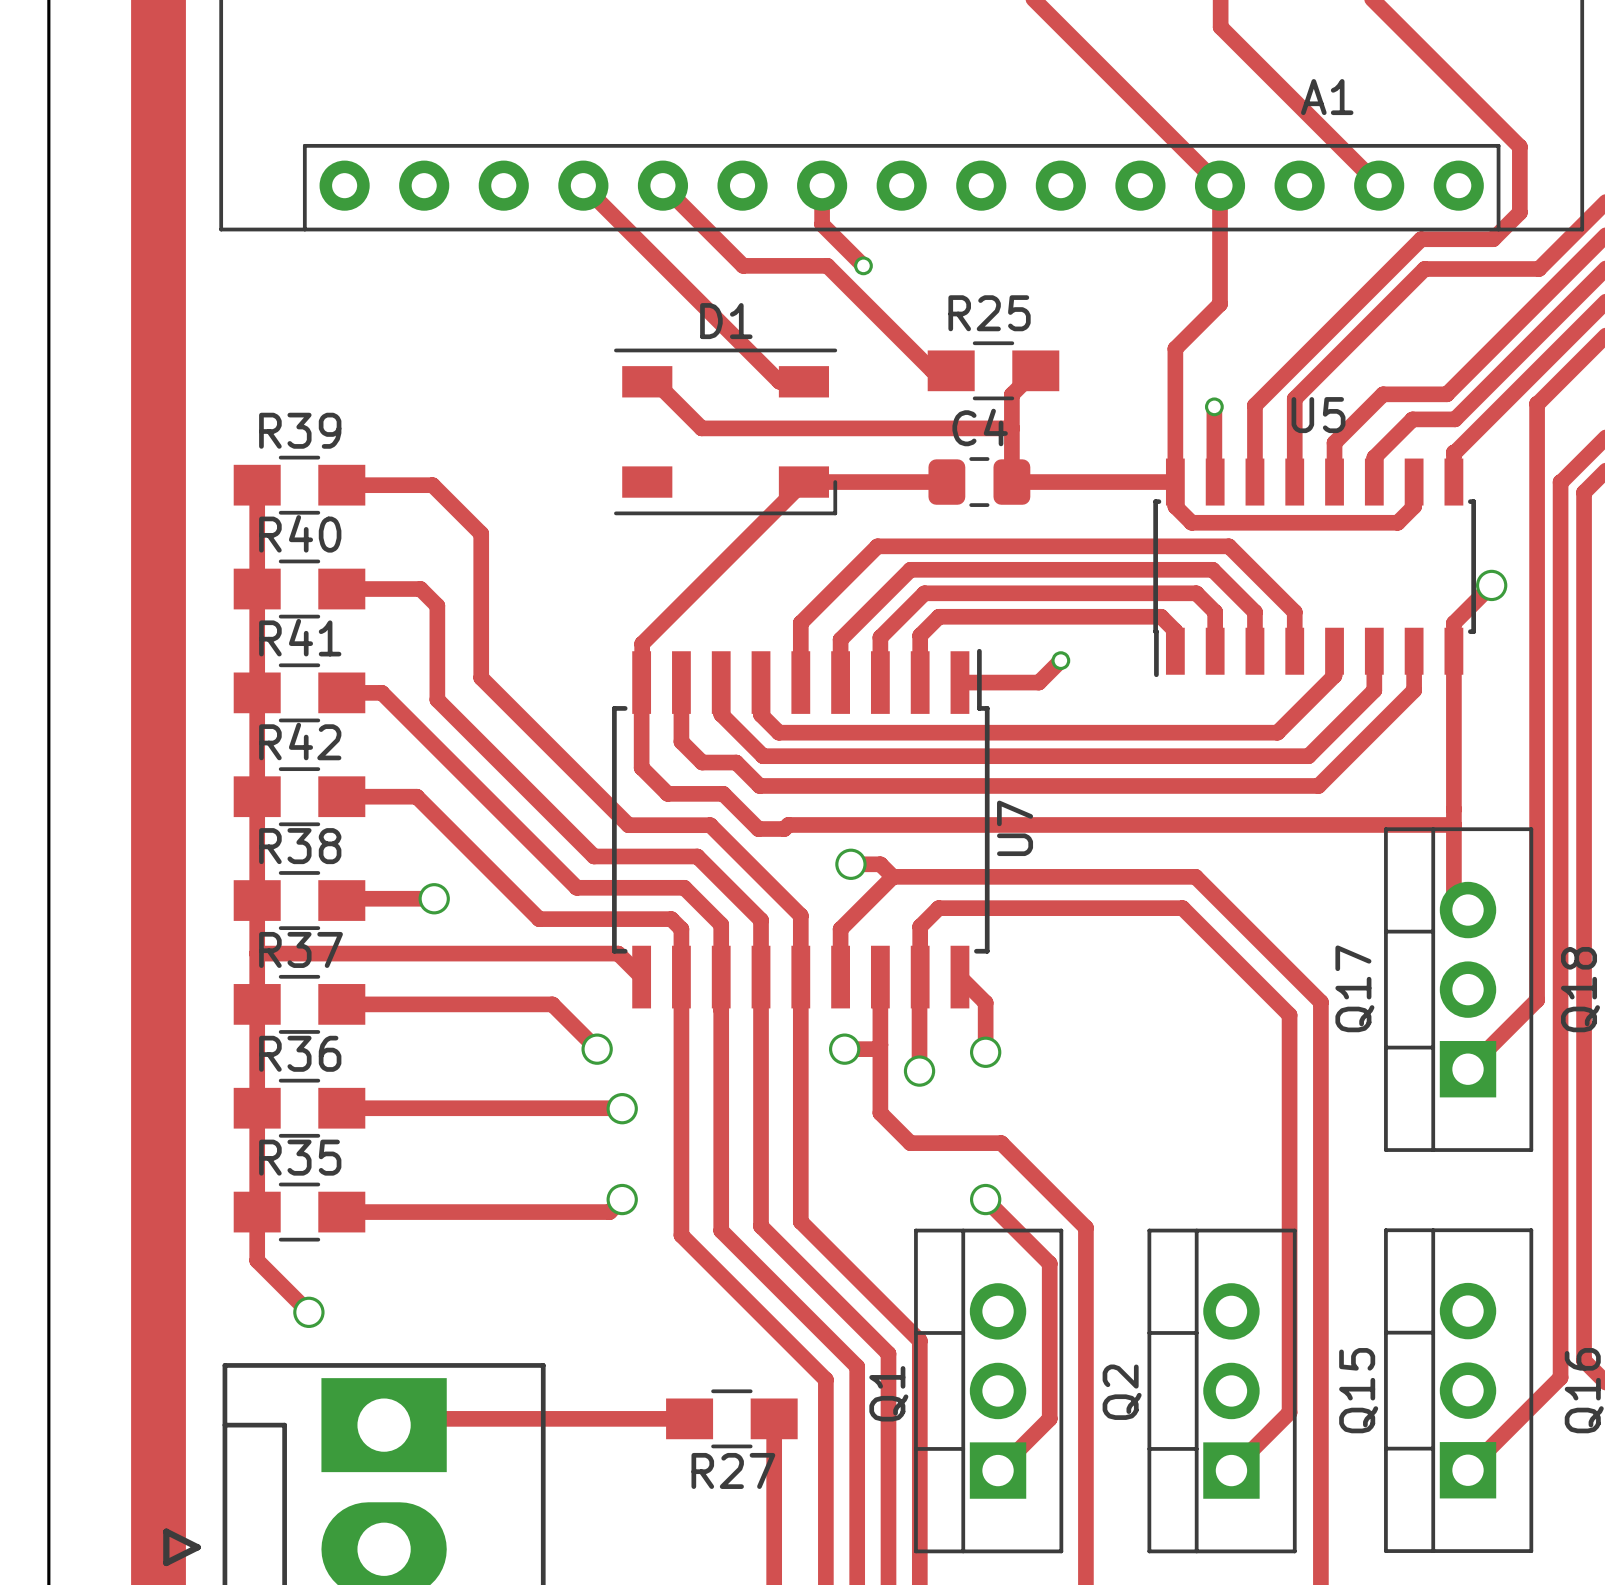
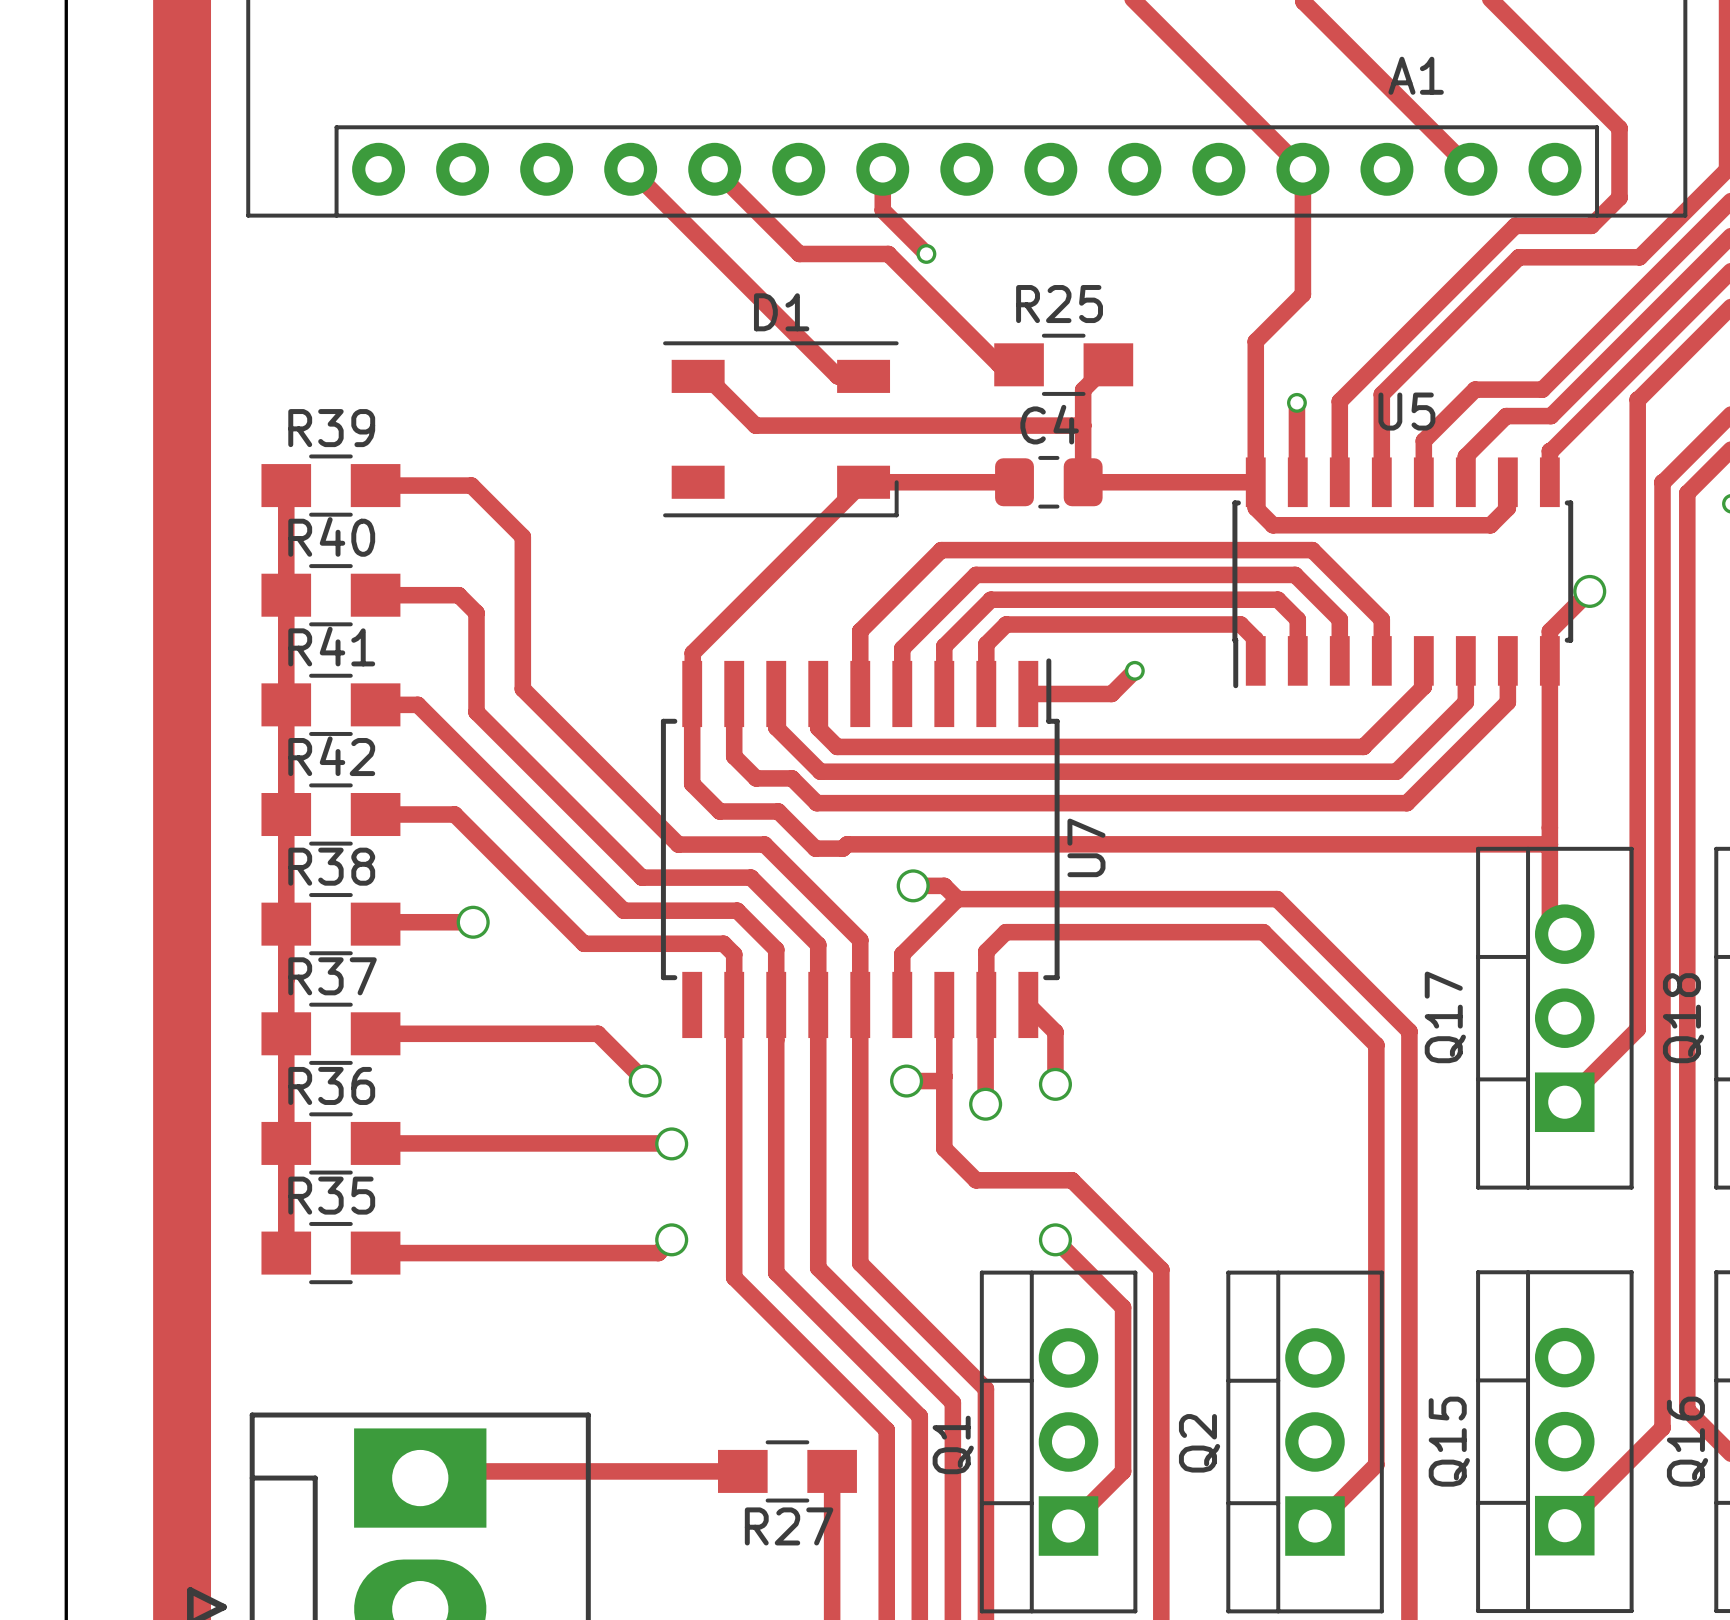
track: (257, 953) (618, 953) (641, 977) -> none
track: (257, 1212) (257, 1260) (308, 1312) -> none
via: (308, 1312) -> none

